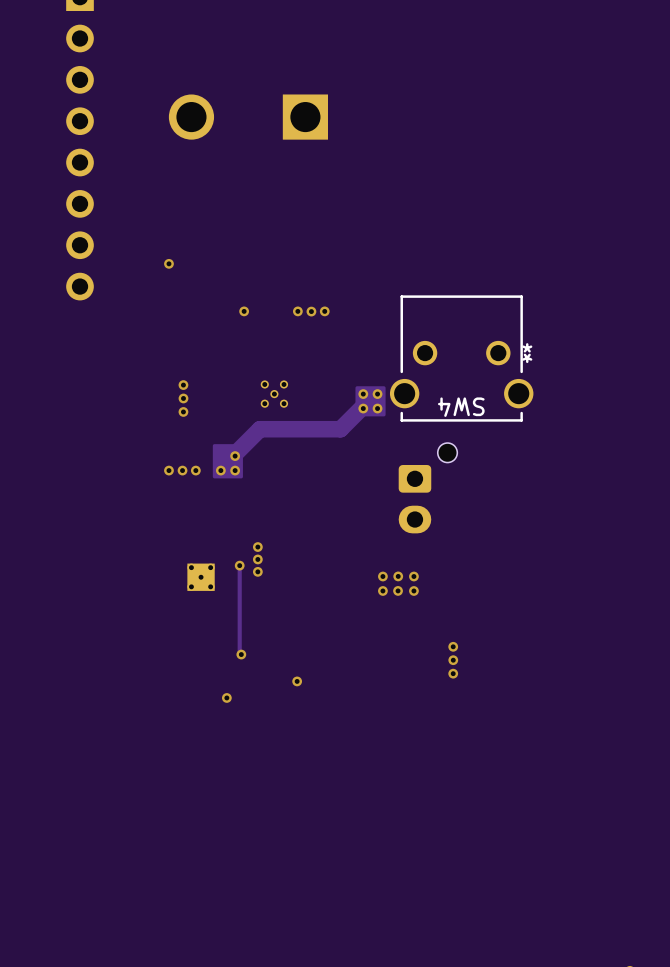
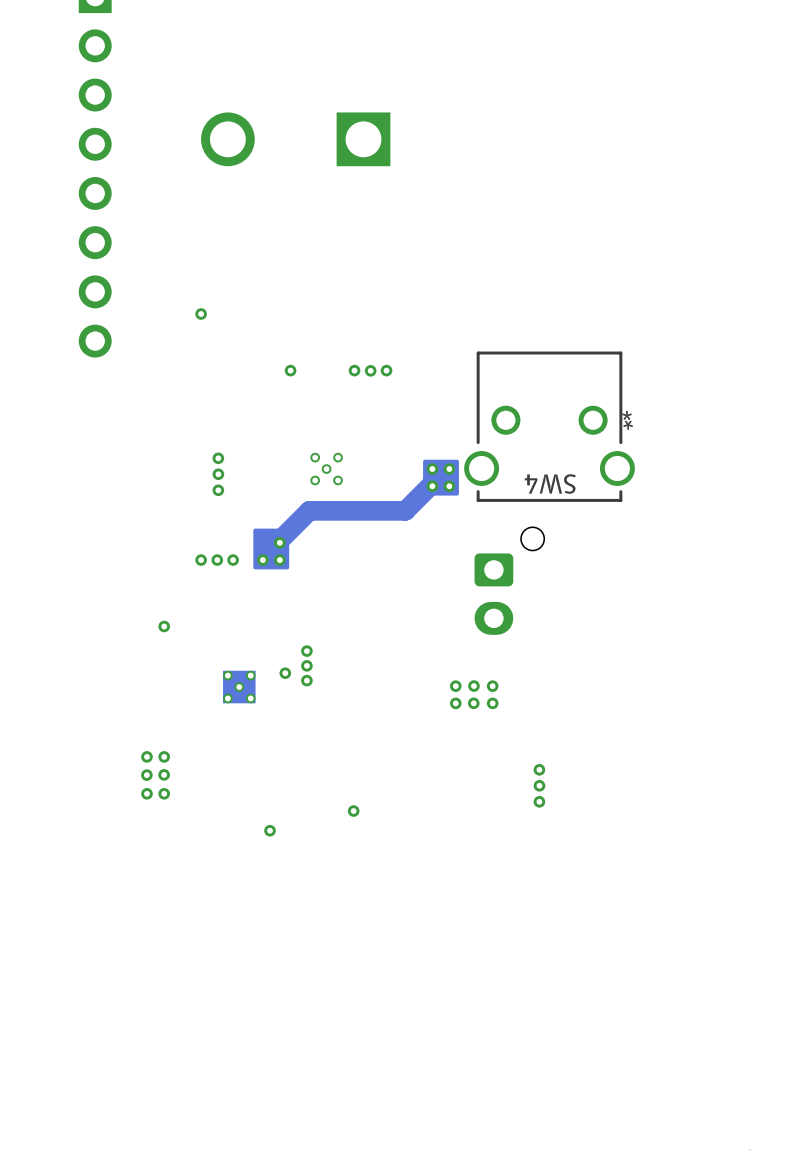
via: none -> (164, 626)
track: (239, 565) (239, 652) (241, 654) -> none
via: none -> (146, 756)
via: none -> (164, 756)
via: none -> (146, 775)
via: none -> (164, 774)
via: (241, 654) -> none
via: none -> (146, 793)
via: none -> (164, 793)

